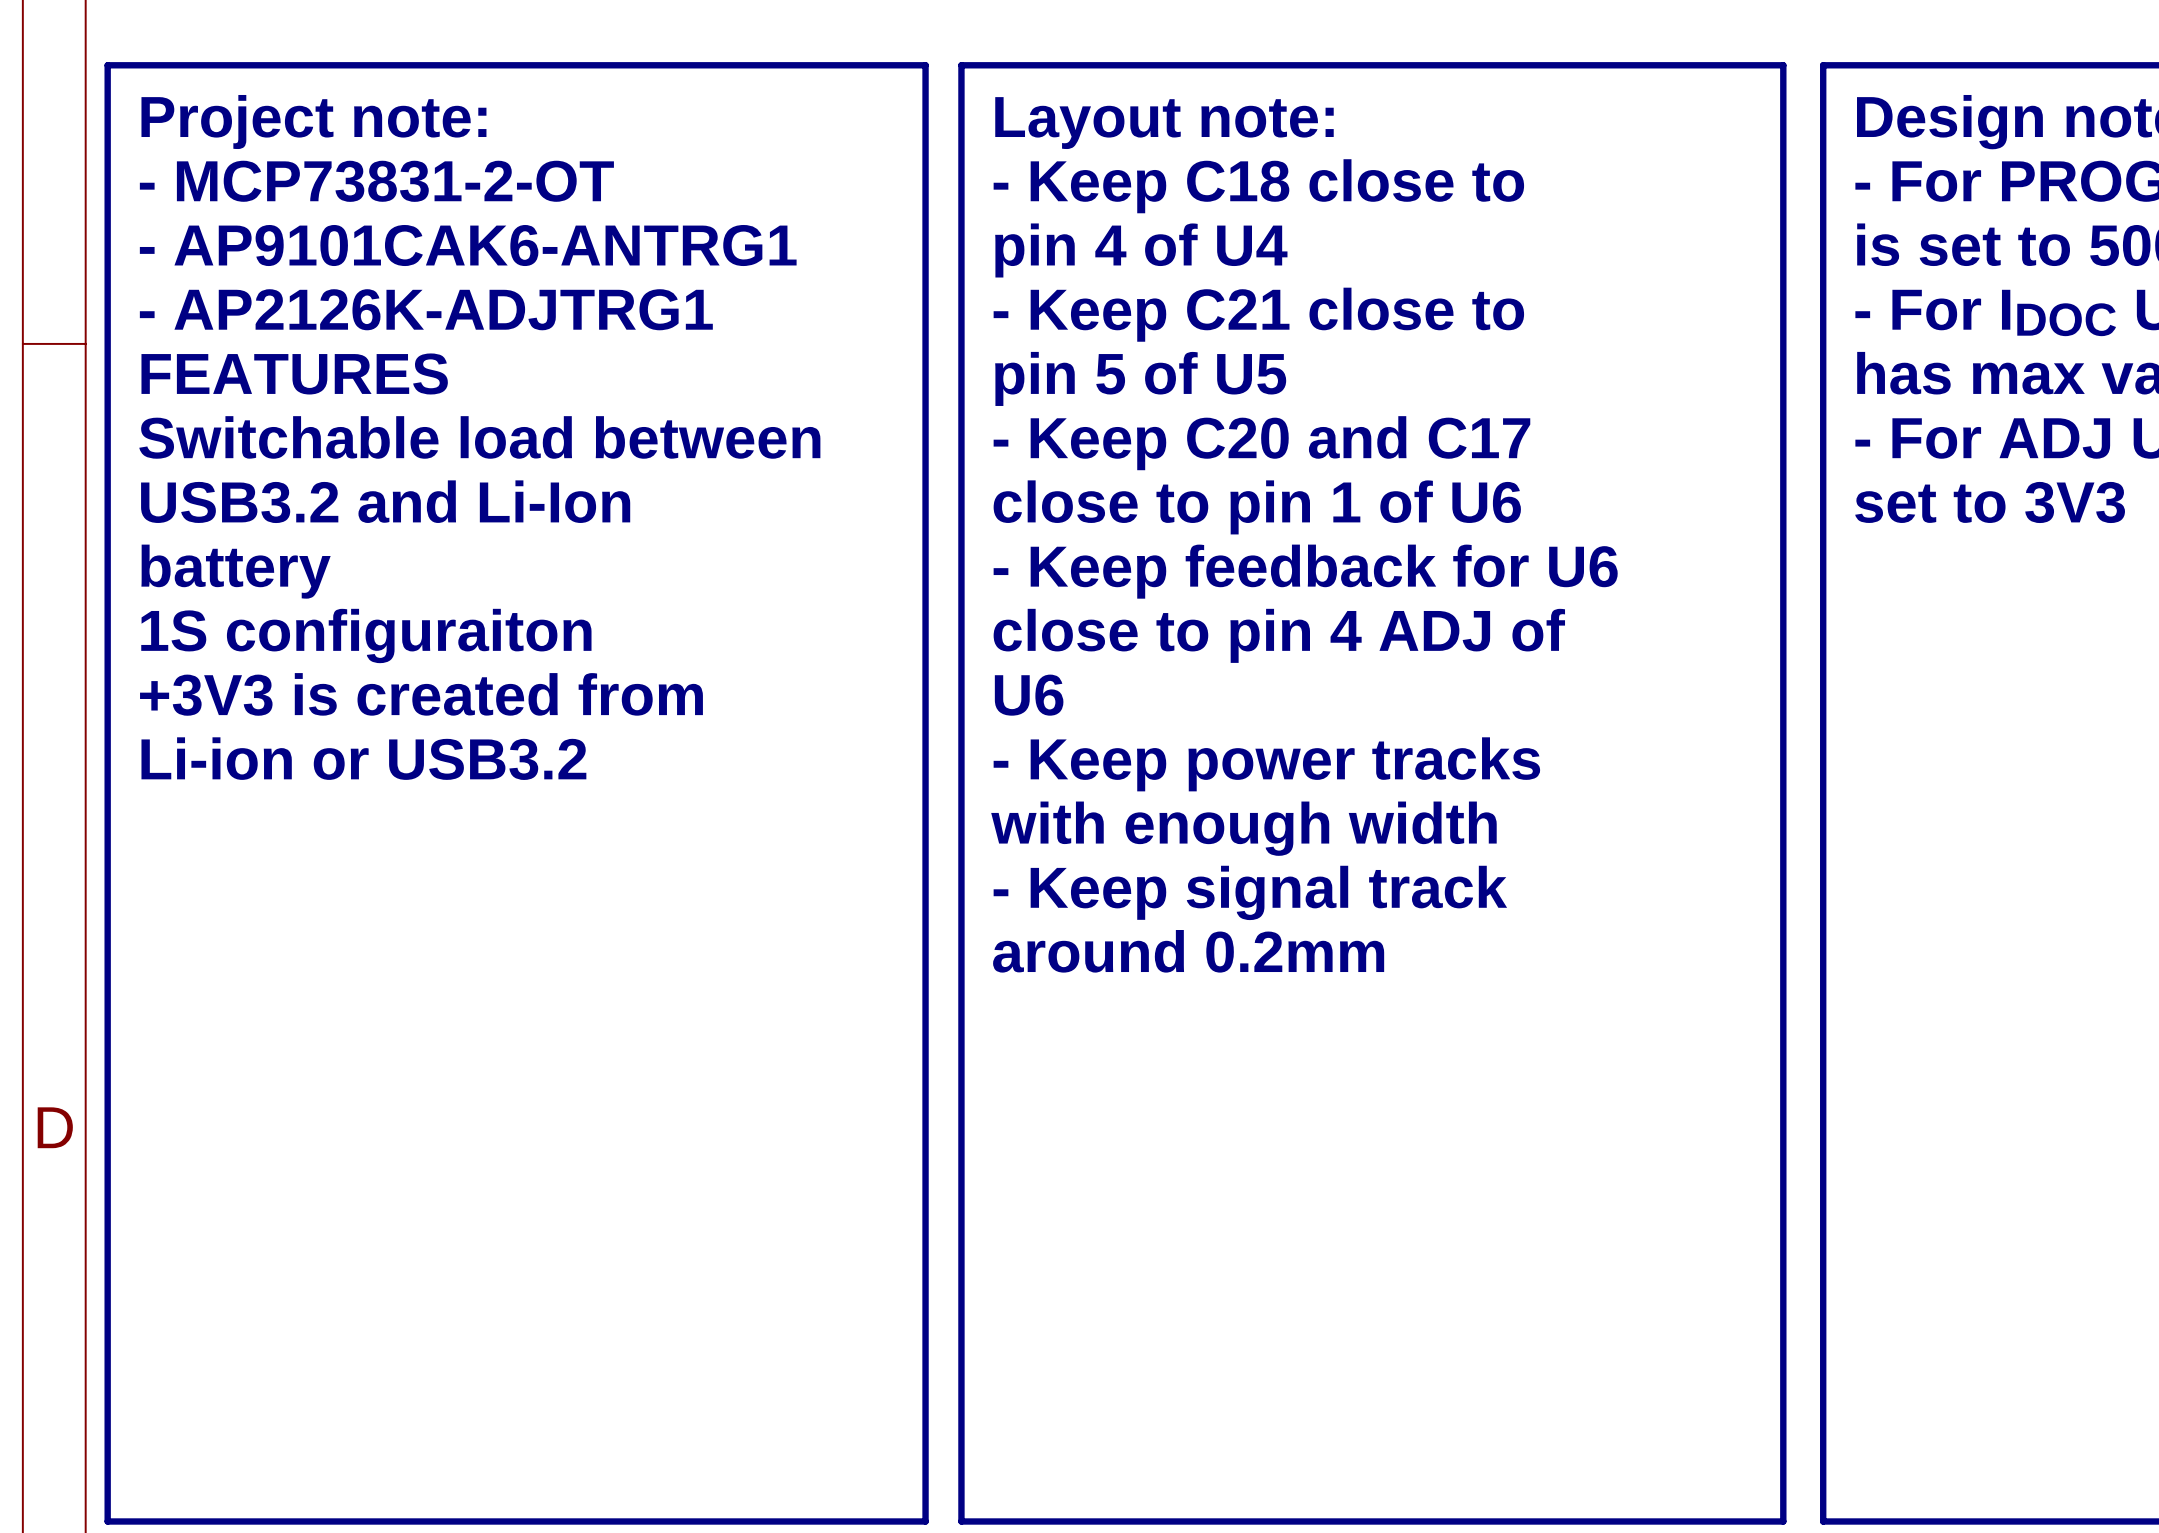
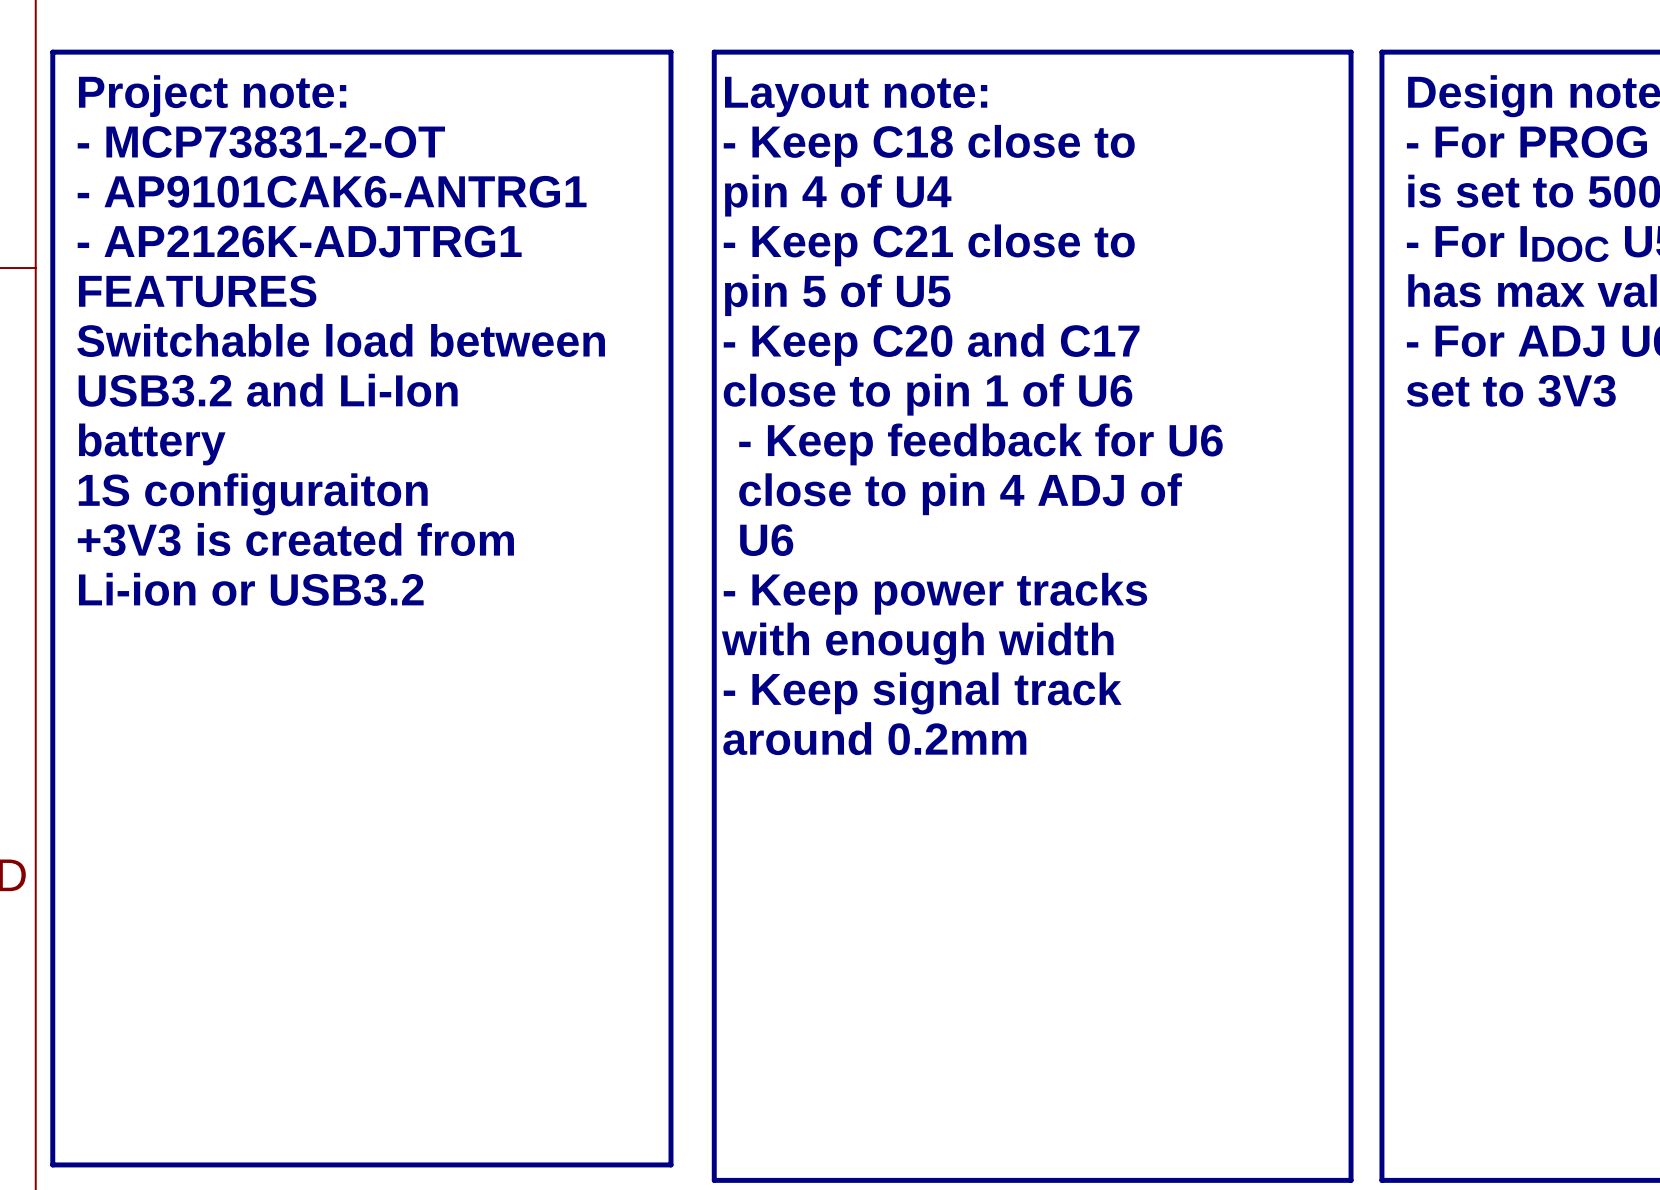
line: (905, 65) (925, 65) (925, 1521) (107, 1521) (107, 1501) -> (670, 52) (670, 1164) (52, 1164)
text position: Layout note: (1164, 123) -> Layout note: (856, 96)
text position: - Keep C18 close to (1258, 186) -> - Keep C18 close to (929, 145)
text position: pin 4 of U4 (1141, 250) -> pin 4 of U4 (838, 195)
text position: - Keep C21 close to (1258, 314) -> - Keep C21 close to (929, 245)
text position: pin 5 of U5 (1140, 378) -> pin 5 of U5 (837, 295)
text position: - Keep C20 and C17 (1261, 443) -> - Keep C20 and C17 (931, 344)
text position: close to pin 1 of U6 (1257, 507) -> close to pin 1 of U6 (928, 394)
text position: - Keep power tracks (1266, 764) -> - Keep power tracks (935, 593)
text position: with enough width (1243, 828) -> with enough width (917, 643)
text position: - Keep signal track (1250, 892) -> - Keep signal track (922, 693)
text position: around 0.2mm (1188, 951) -> around 0.2mm (874, 738)

